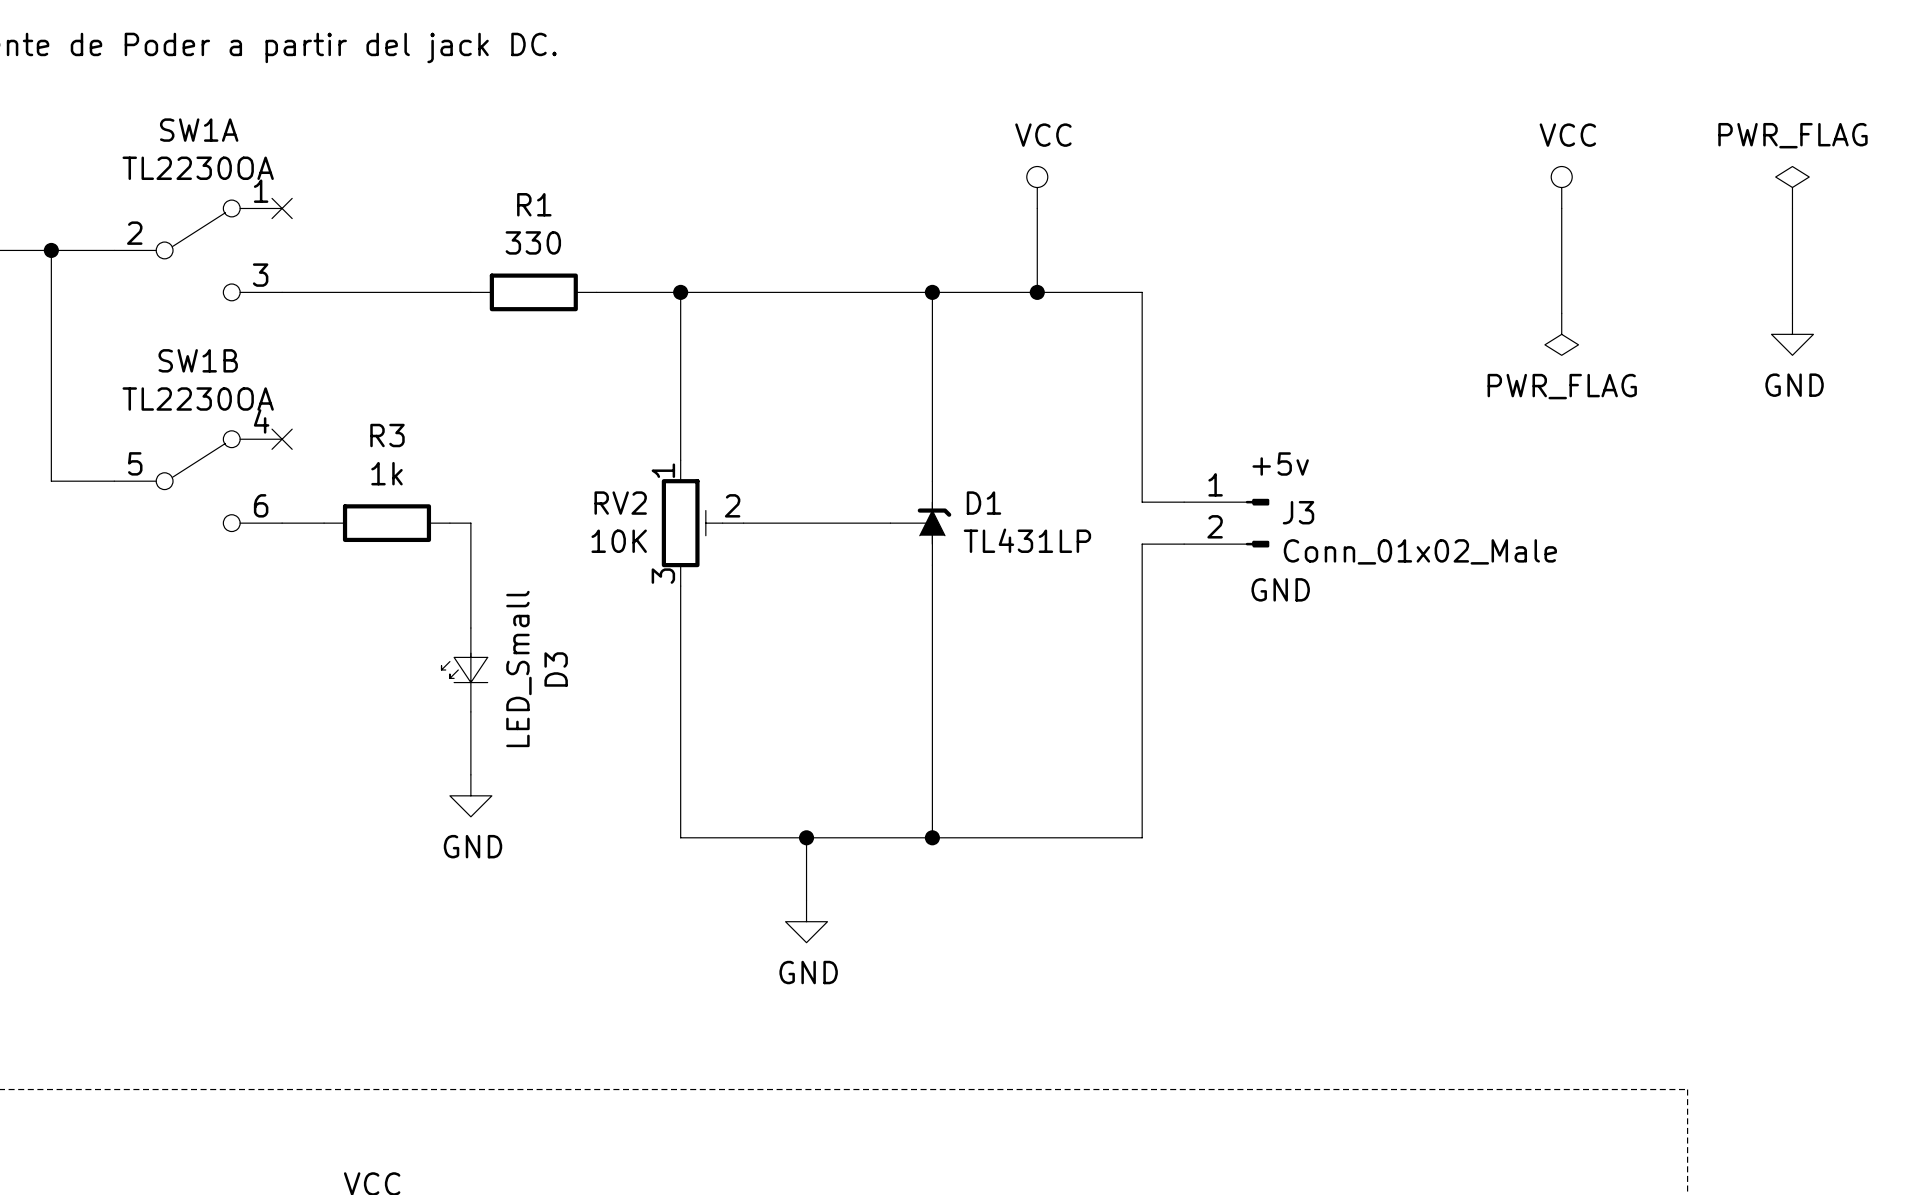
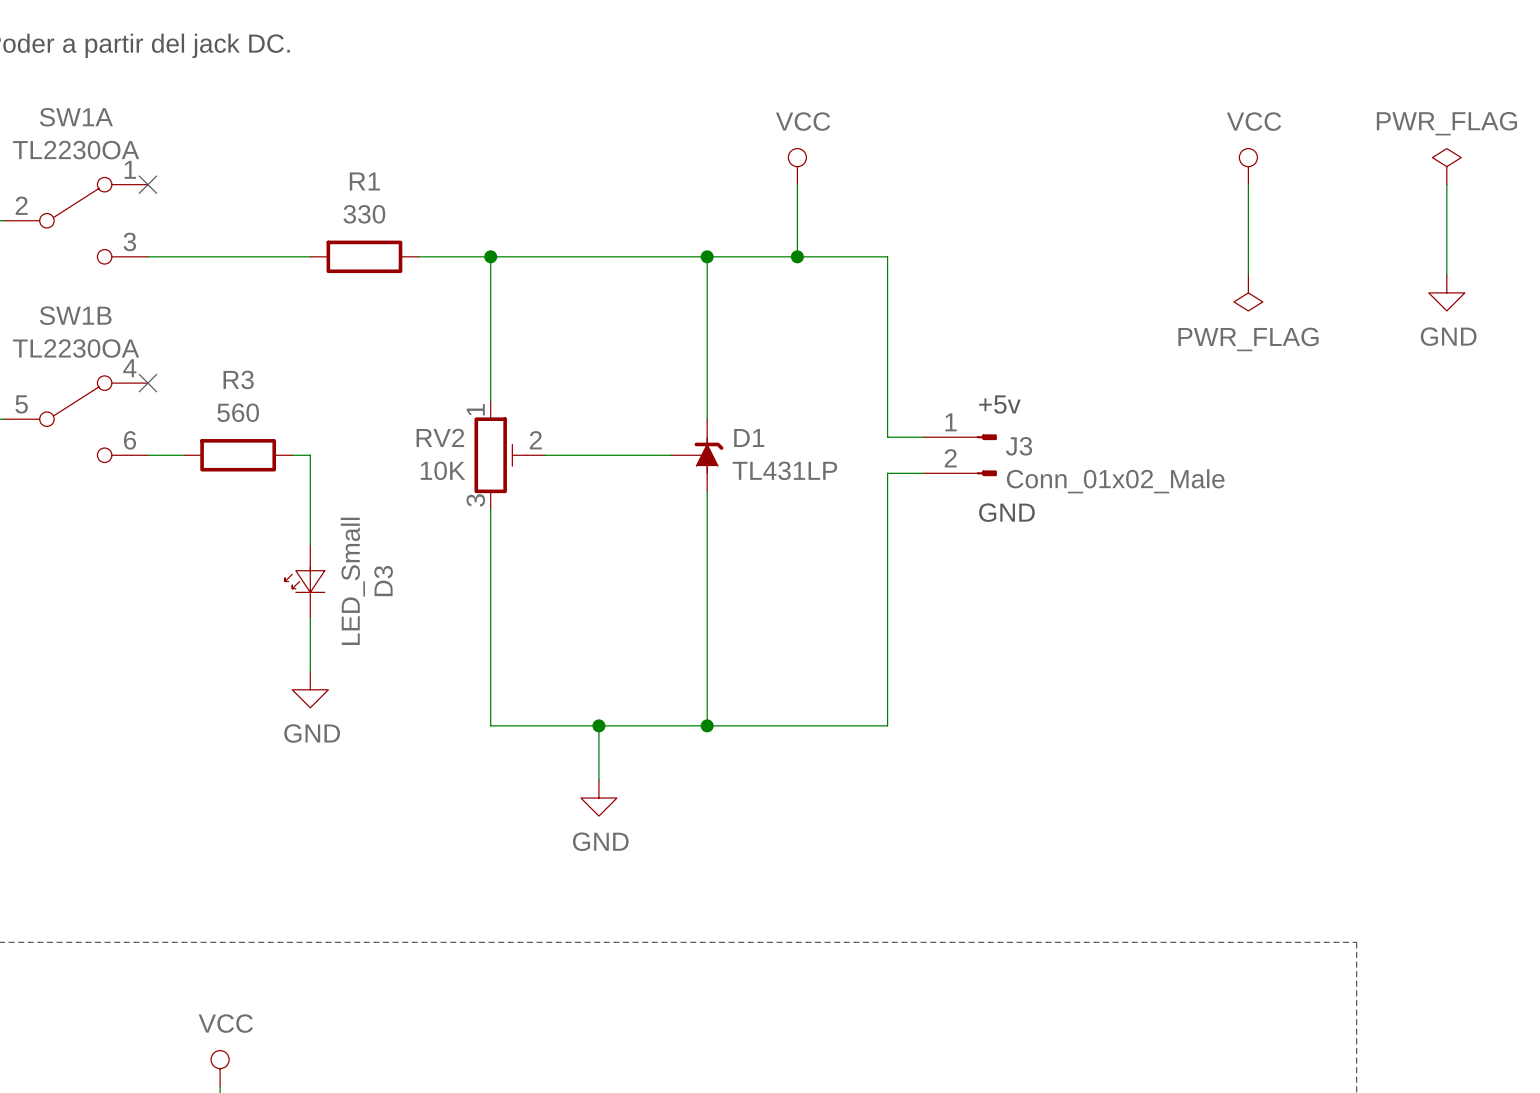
R3 value: 1k (386, 473) -> 560 (238, 412)

